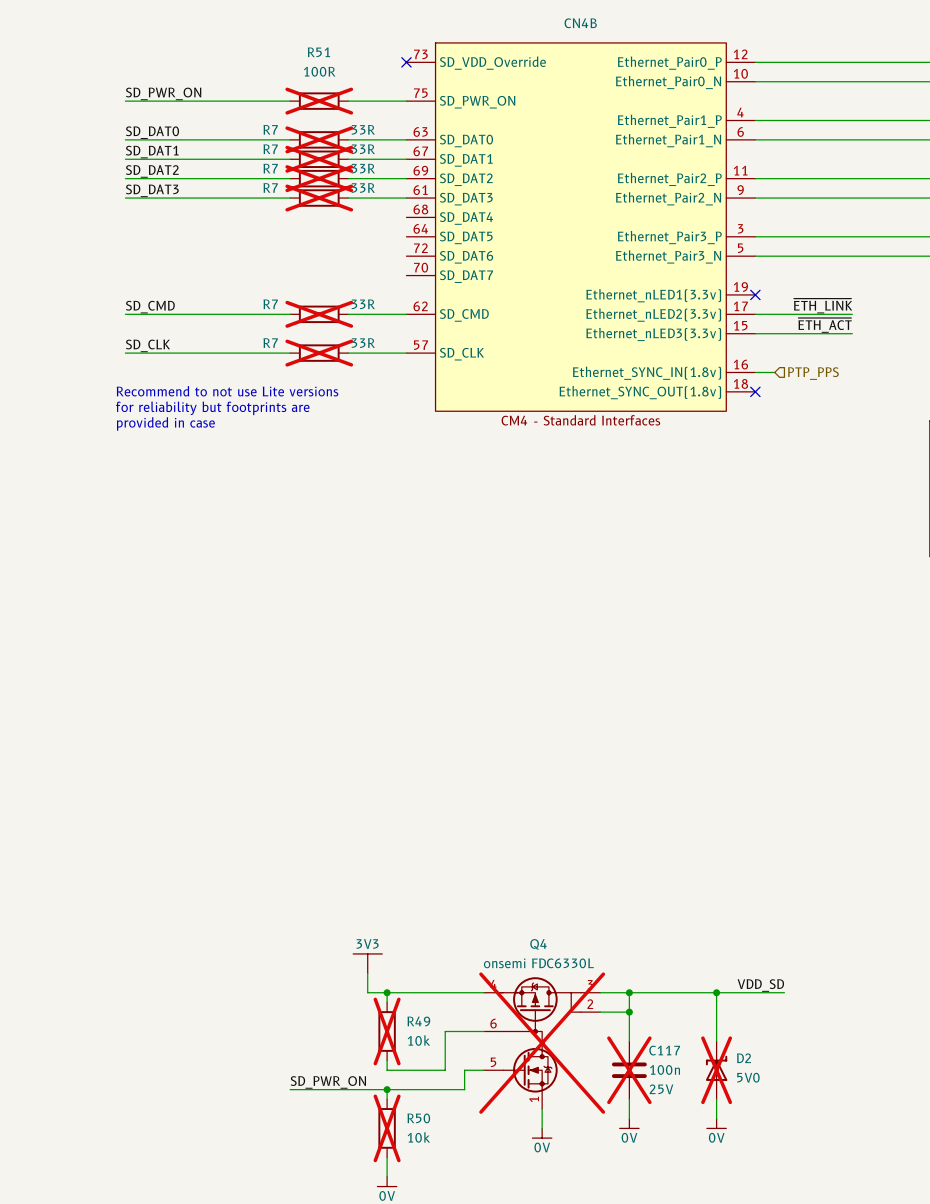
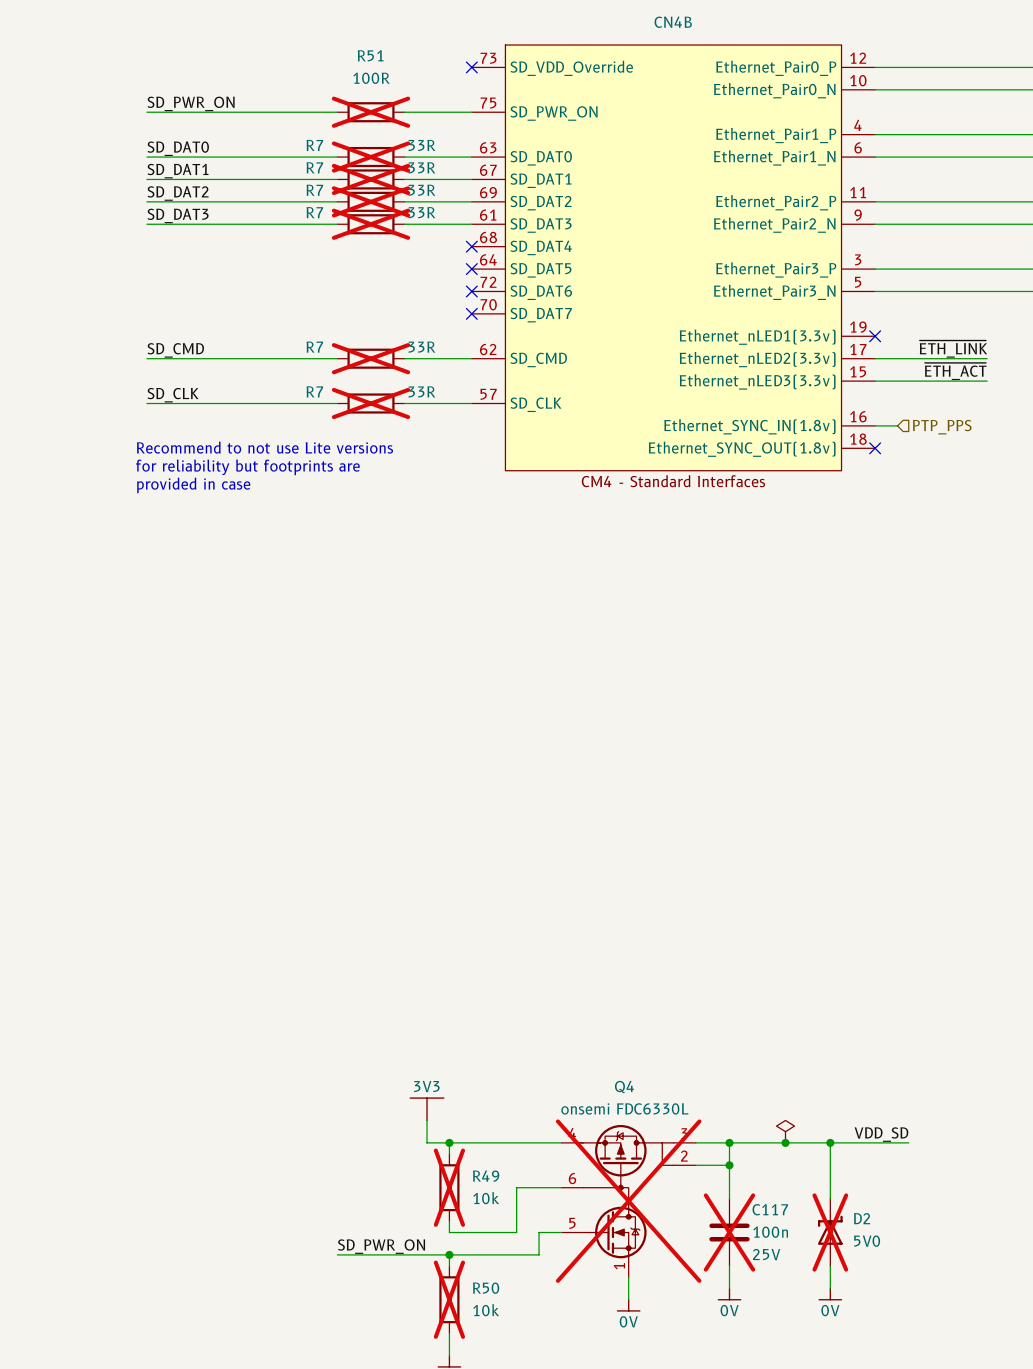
no-connect mark: none -> (471, 246)
no-connect mark: none -> (471, 269)
no-connect mark: none -> (471, 291)
no-connect mark: none -> (471, 313)
power symbol: none -> (785, 1131)
junction: none -> (785, 1142)

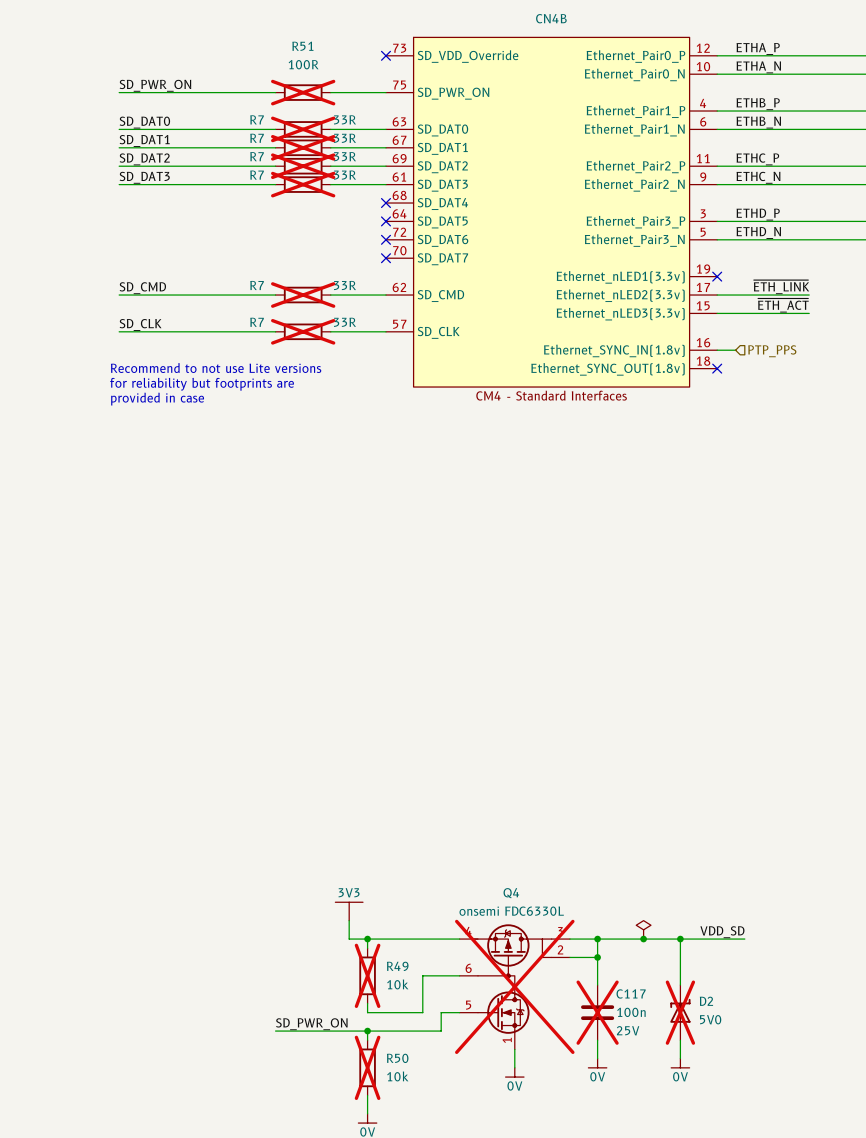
label: none -> ETHA_P (758, 48)
label: none -> ETHA_N (758, 67)
label: none -> ETHB_P (758, 104)
label: none -> ETHB_N (758, 122)
label: none -> ETHC_P (757, 159)
label: none -> ETHC_N (758, 177)
label: none -> ETHD_P (758, 214)
label: none -> ETHD_N (758, 232)

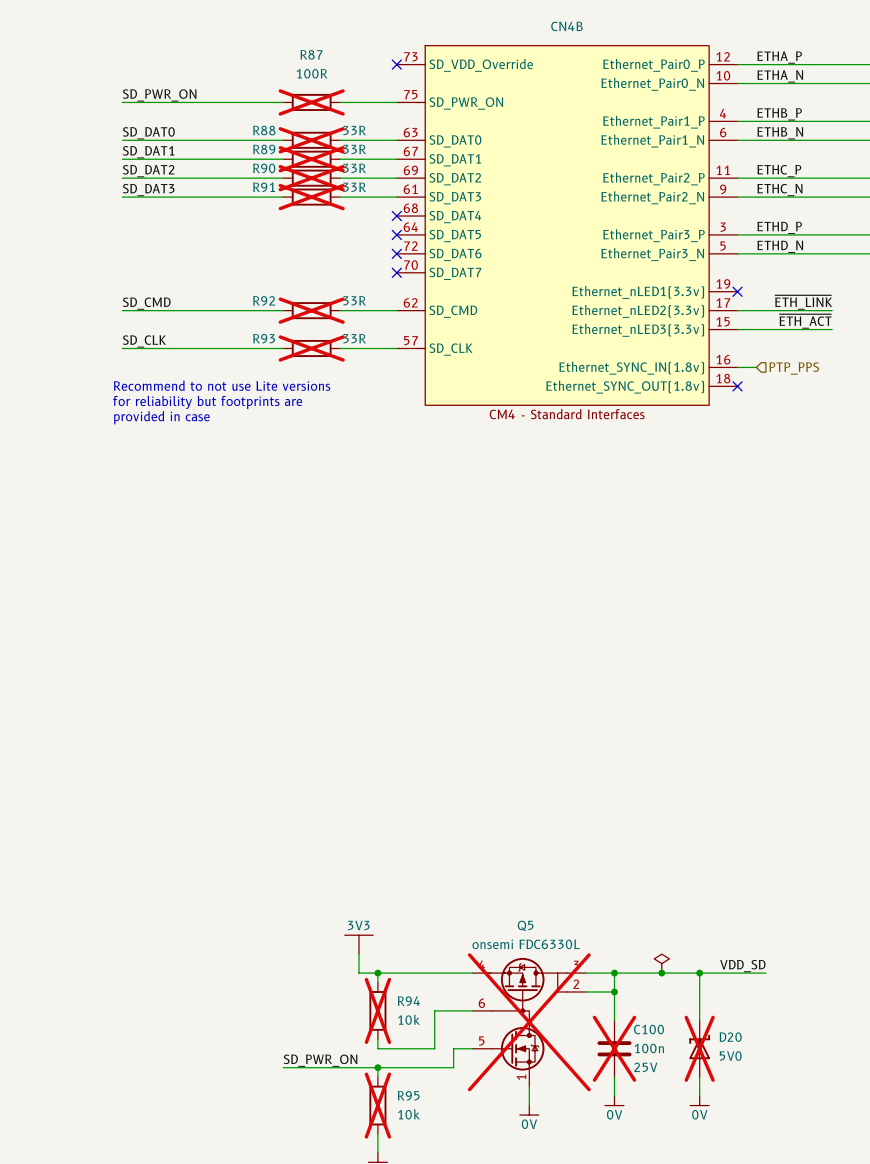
R51 name: R51 (302, 46) -> R87 (311, 54)
R7 name: R7 (257, 119) -> R88 (264, 130)
R7 name: R7 (257, 138) -> R89 (264, 149)
R7 name: R7 (257, 156) -> R90 (264, 168)
R7 name: R7 (257, 175) -> R91 (264, 187)
R7 name: R7 (257, 285) -> R92 (264, 300)
R7 name: R7 (257, 322) -> R93 (264, 338)
Q4 name: Q4 (511, 893) -> Q5 (525, 925)
R49 name: R49 (397, 966) -> R94 (408, 1001)
C117 name: C117 (631, 993) -> C100 (648, 1029)
D2 name: D2 (706, 1001) -> D20 (730, 1037)
R50 name: R50 (397, 1058) -> R95 (408, 1095)

